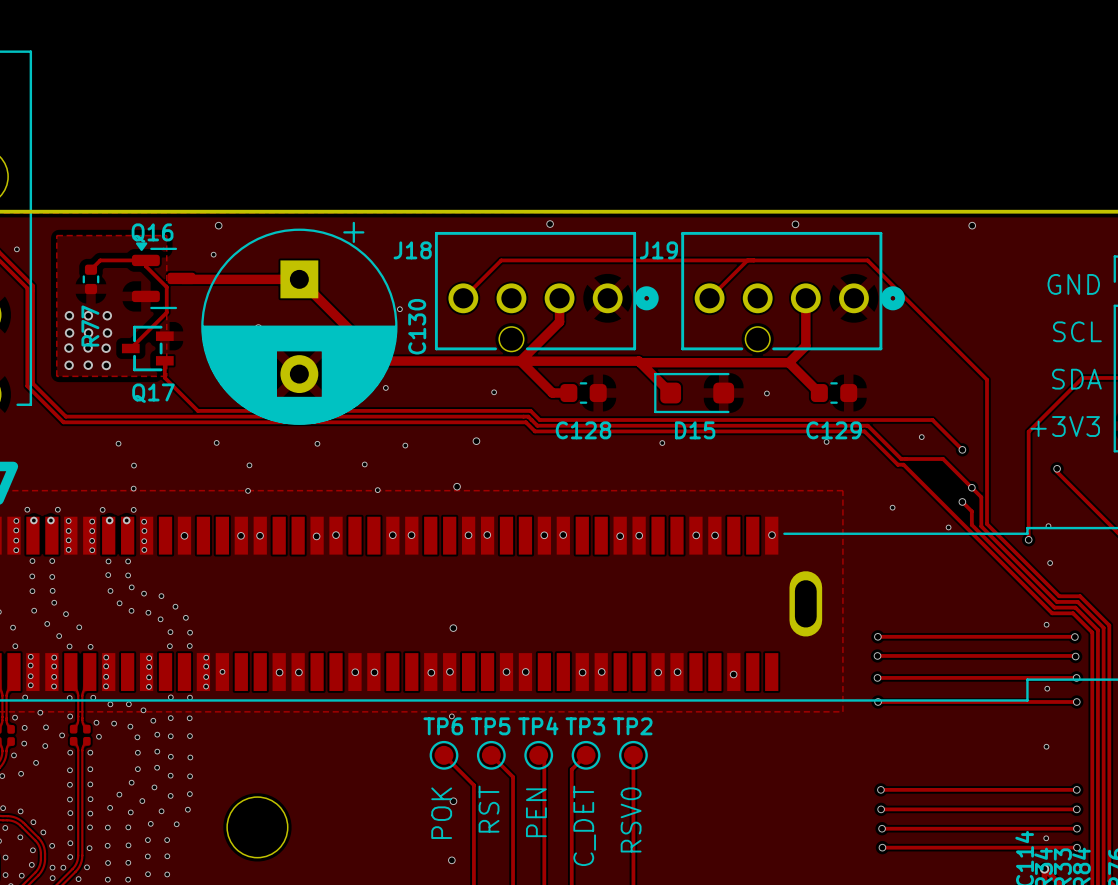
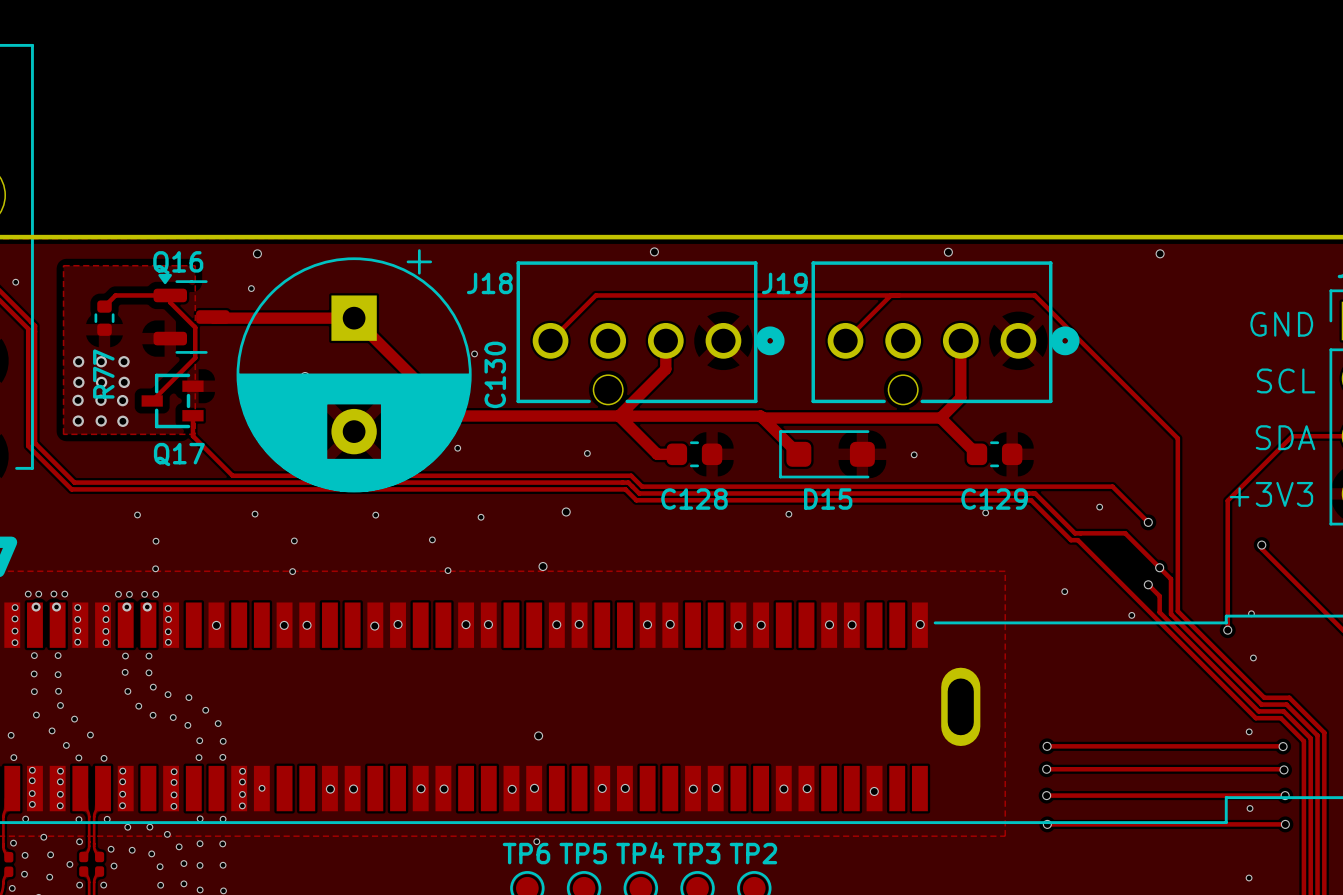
via: none -> (38, 594)
via: none -> (53, 593)
via: none -> (129, 594)
via: none -> (144, 594)

